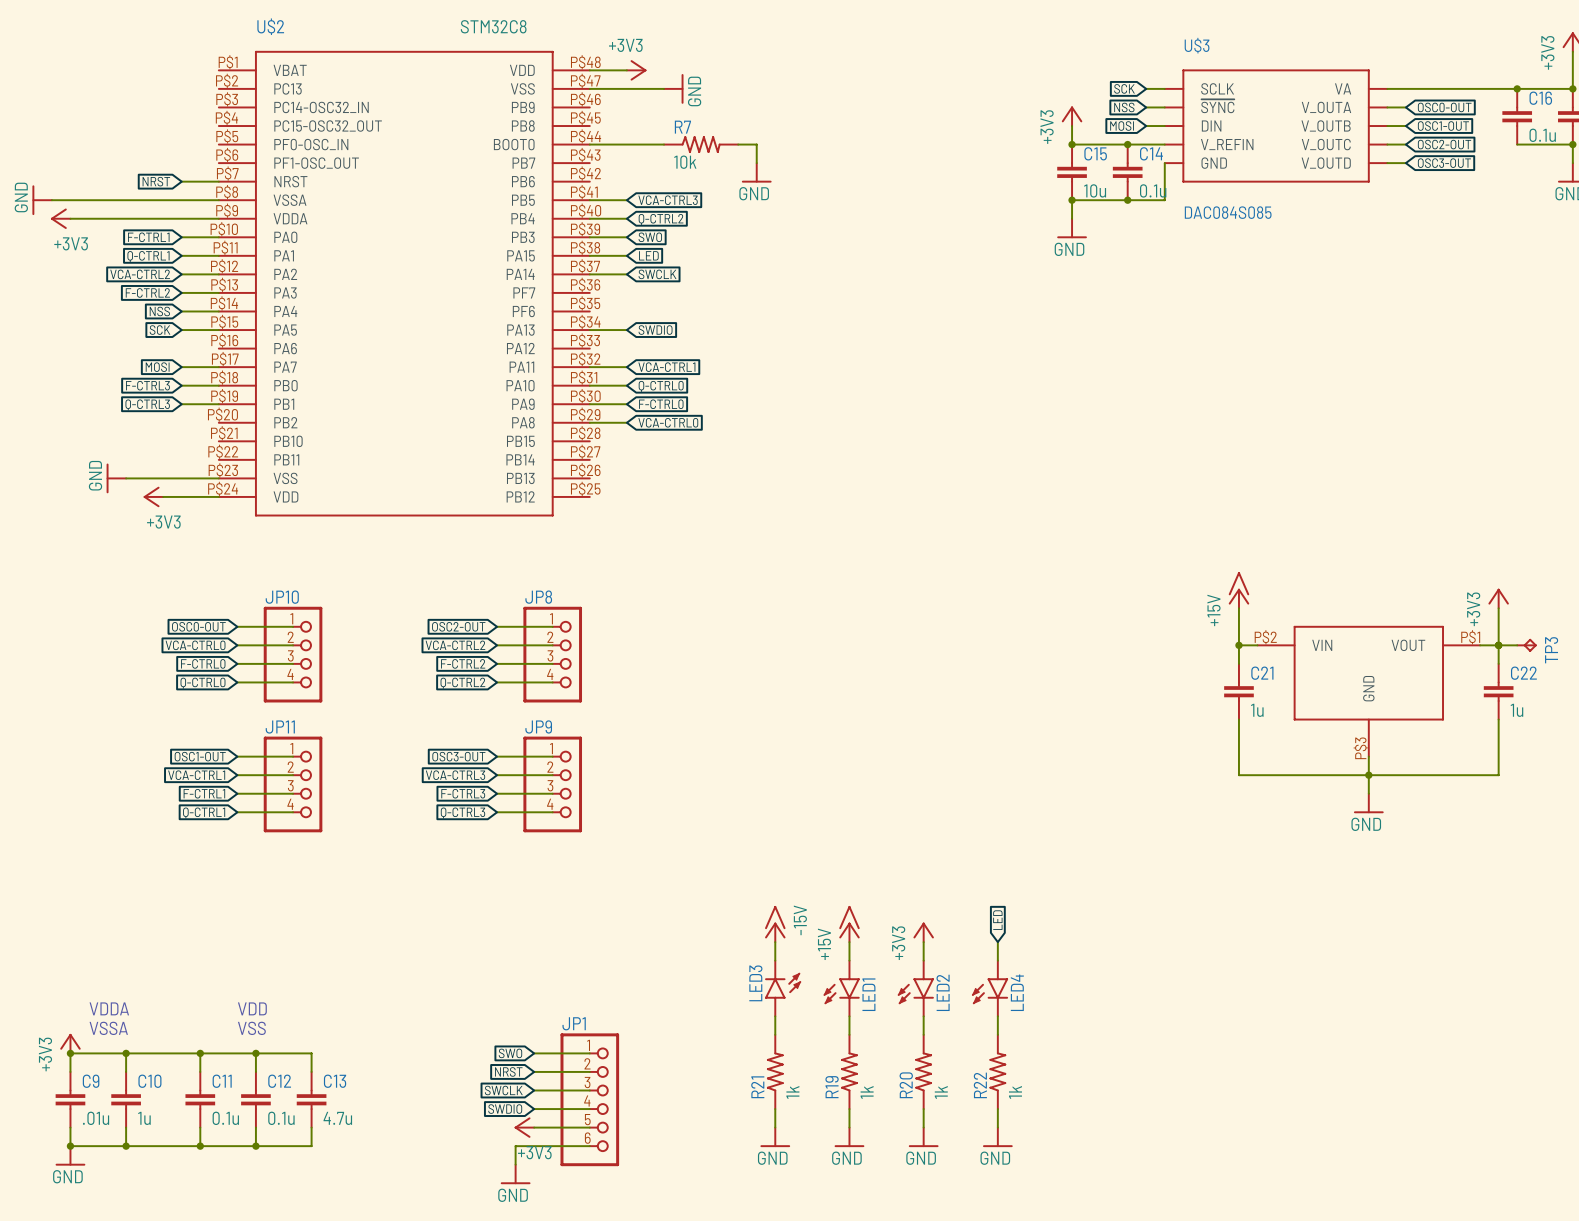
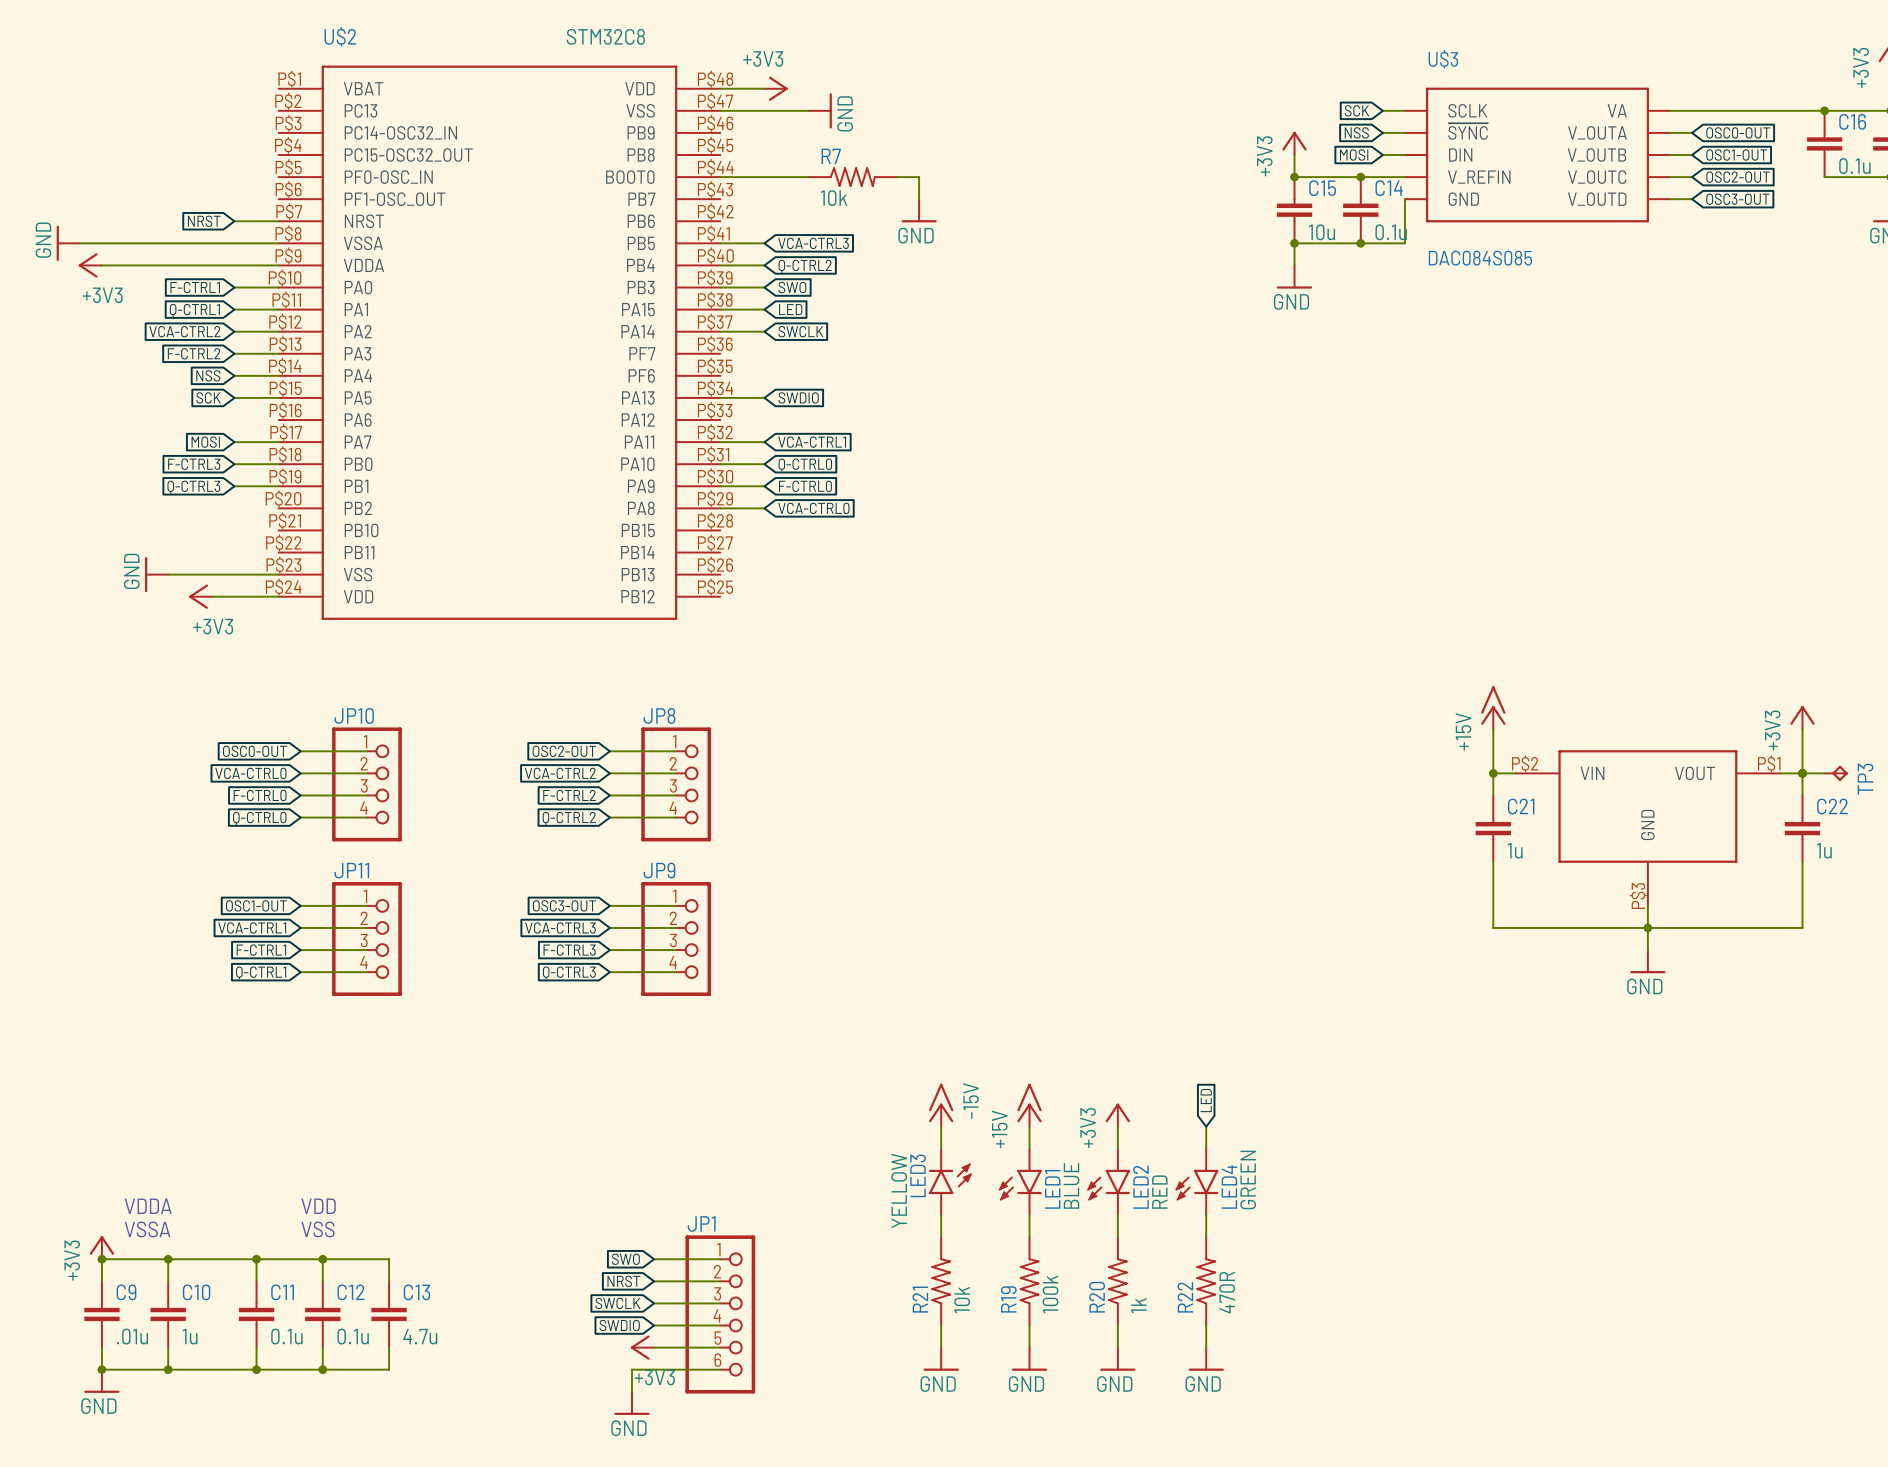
LED4 value: none -> GREEN (1248, 1179)
LED1 value: none -> BLUE (1071, 1185)
LED3 value: none -> YELLOW (899, 1190)
LED2 value: none -> RED (1159, 1192)
R21 value: 1k (792, 1092) -> 10k (962, 1300)
R19 value: 1k (867, 1092) -> 100k (1050, 1294)
R22 value: 1k (1015, 1092) -> 470R (1227, 1292)

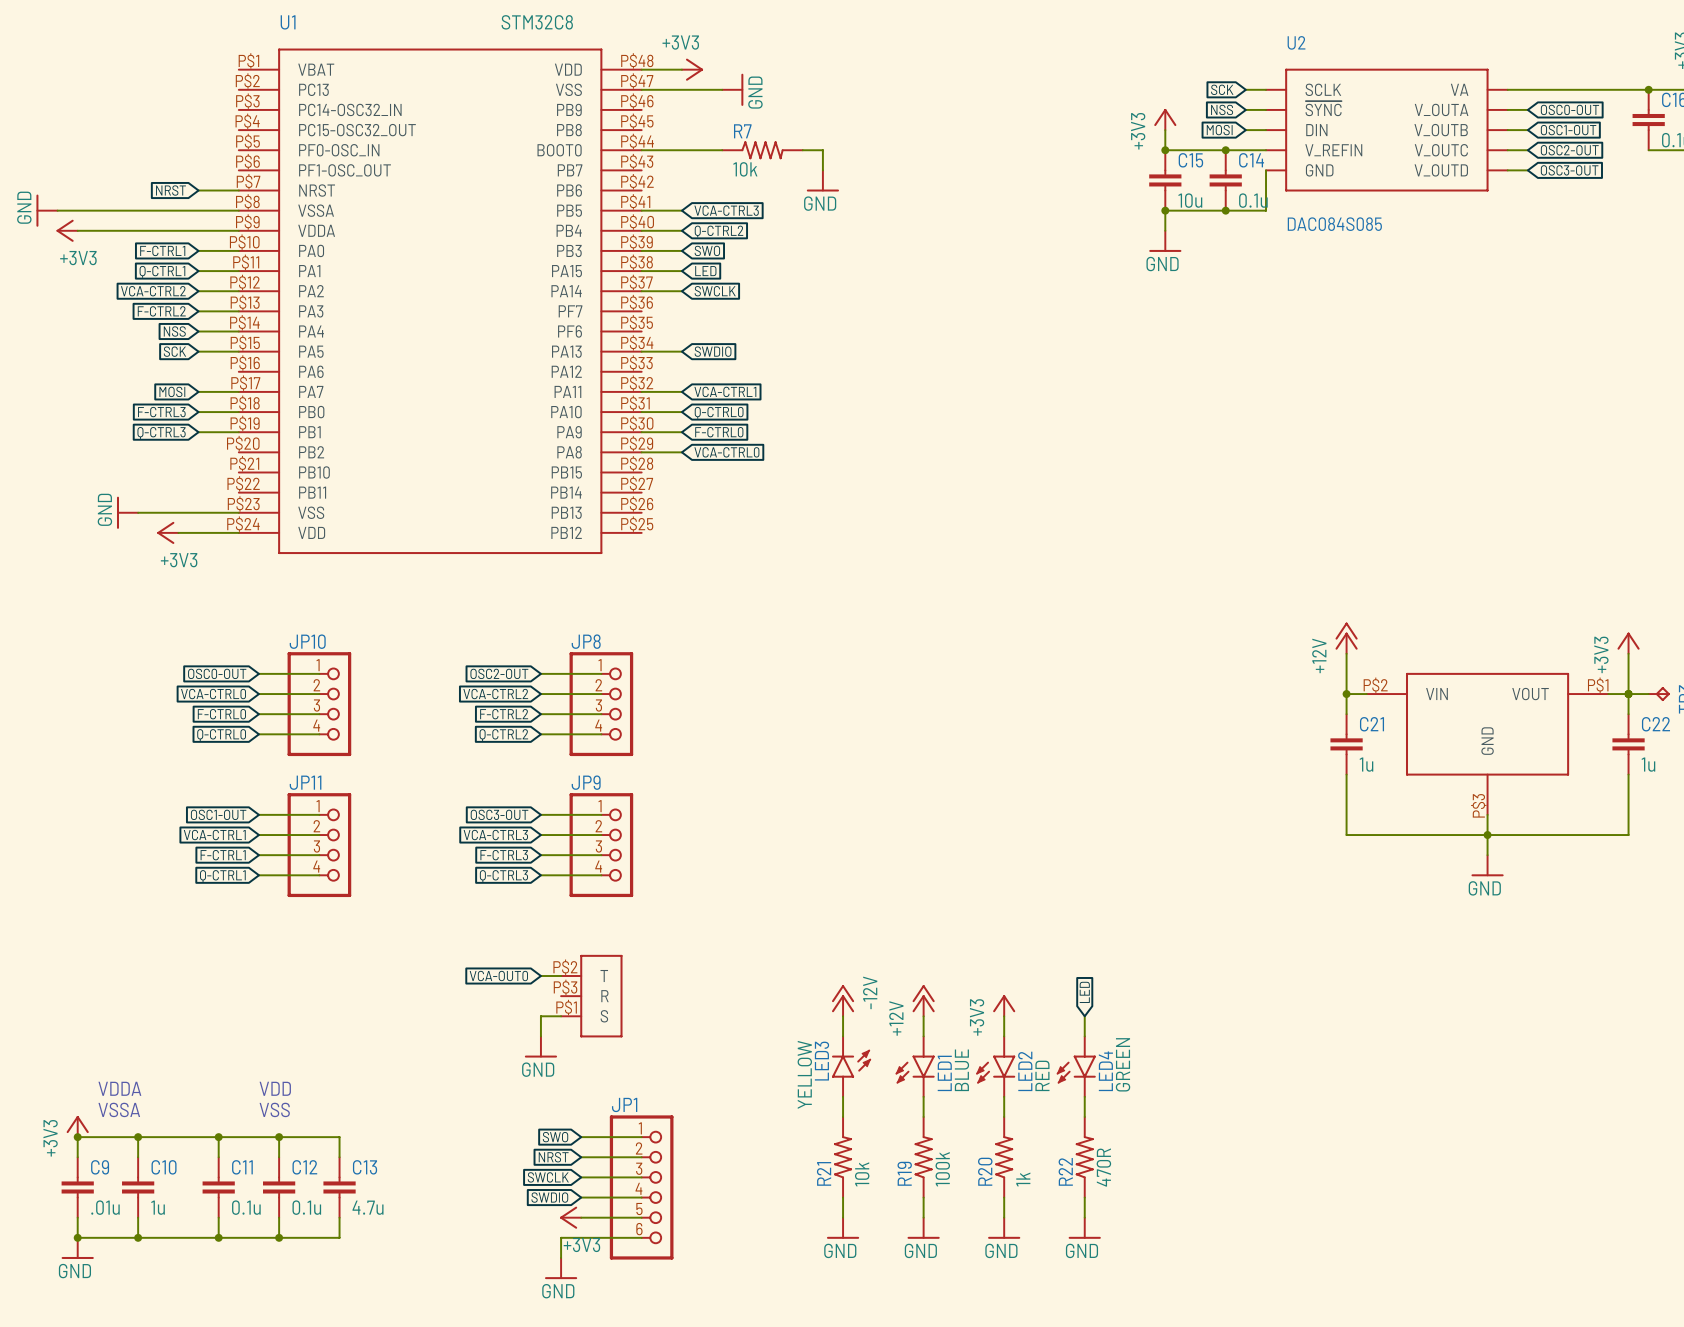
U$2 name: U$2 (340, 36) -> U1 (288, 22)
U$3 name: U$3 (1443, 59) -> U2 (1296, 42)
power symbol: +15V (1493, 707) -> +12V (1346, 638)
global label: none -> VCA-OUT0 (498, 976)
wire: none -> (540, 976) (561, 976)
part: none -> (591, 996)
power symbol: -15V (941, 1105) -> -12V (843, 1000)
power symbol: +15V (1029, 1105) -> +12V (923, 1000)
wire: none -> (561, 1016) (540, 1016) (540, 1036)
power symbol: none -> GND (540, 1047)

